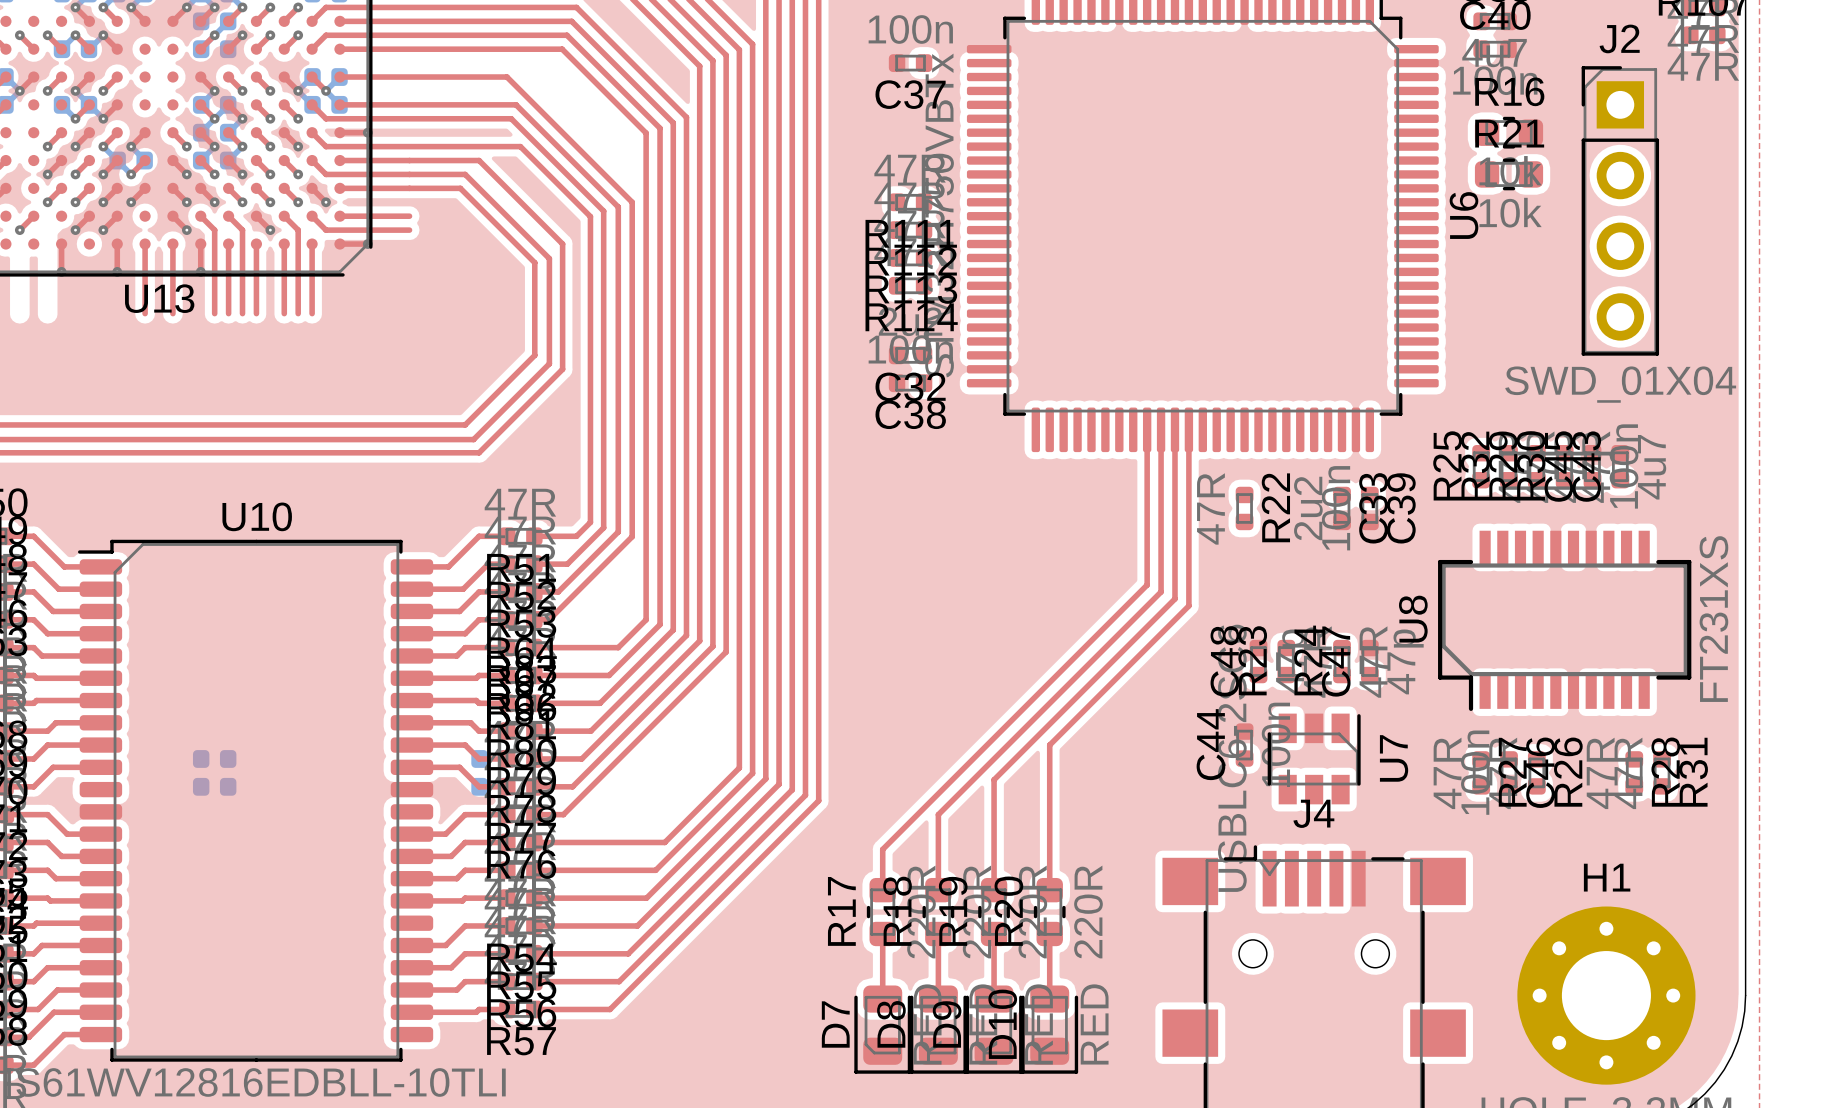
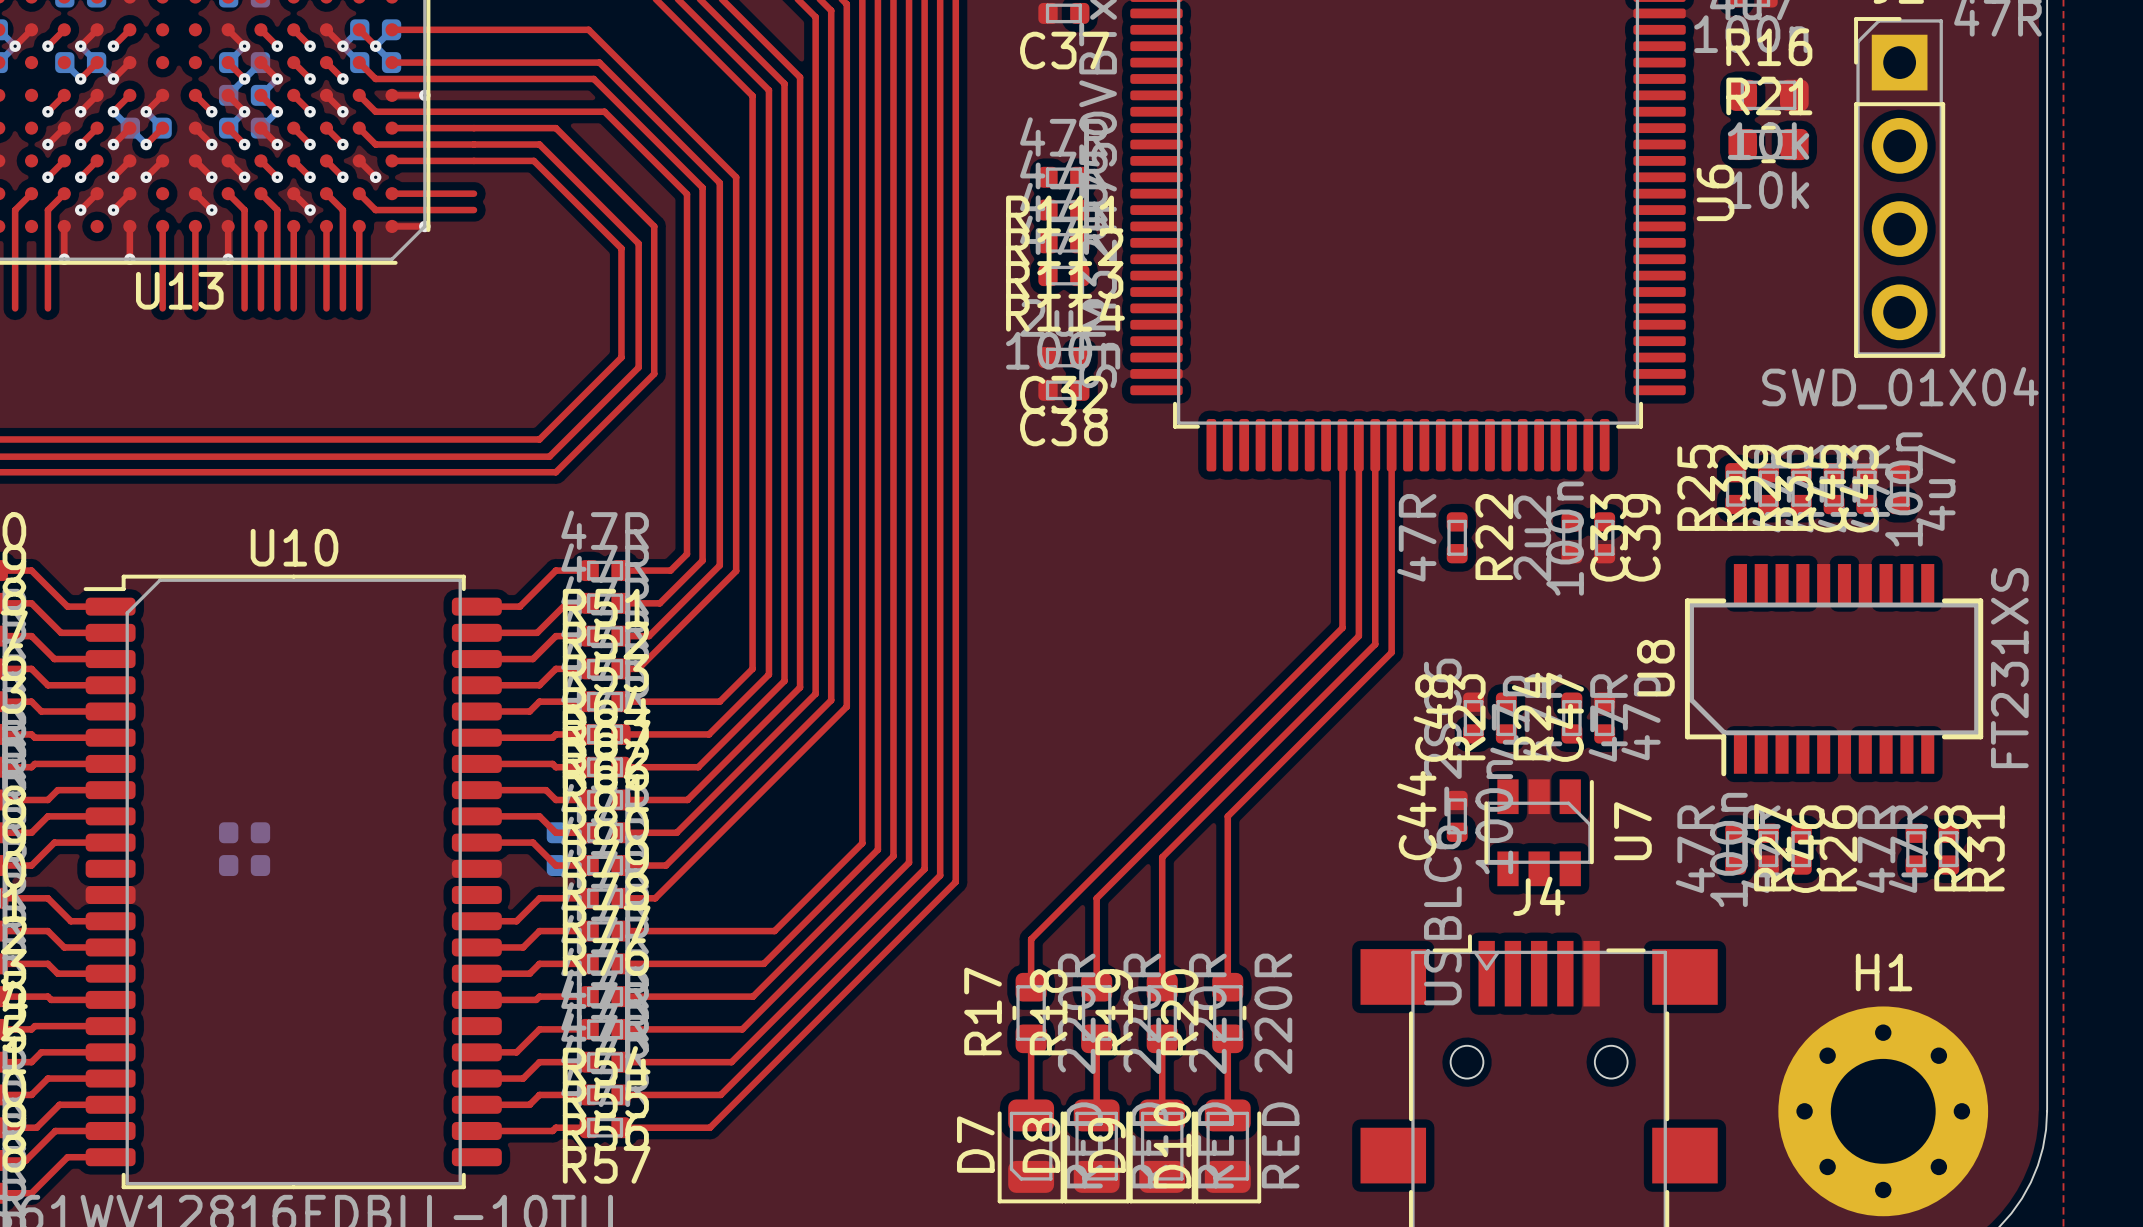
top track: none -> (64, 193) (47, 210) (47, 308)
top track: none -> (15, 210) (15, 308)
via: (19, 230) -> none

